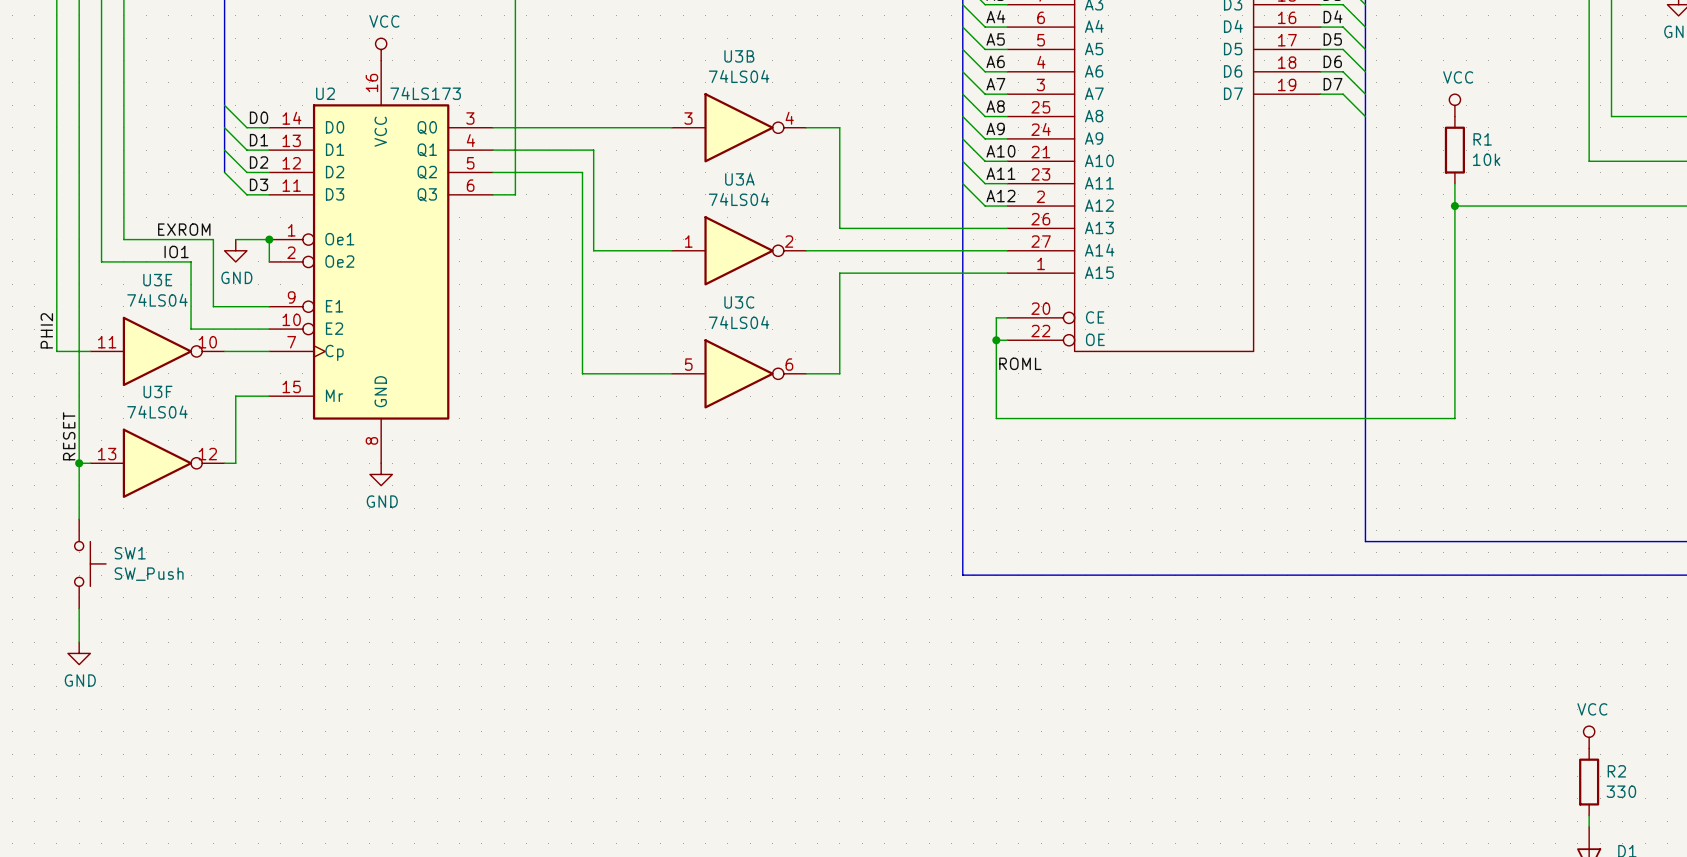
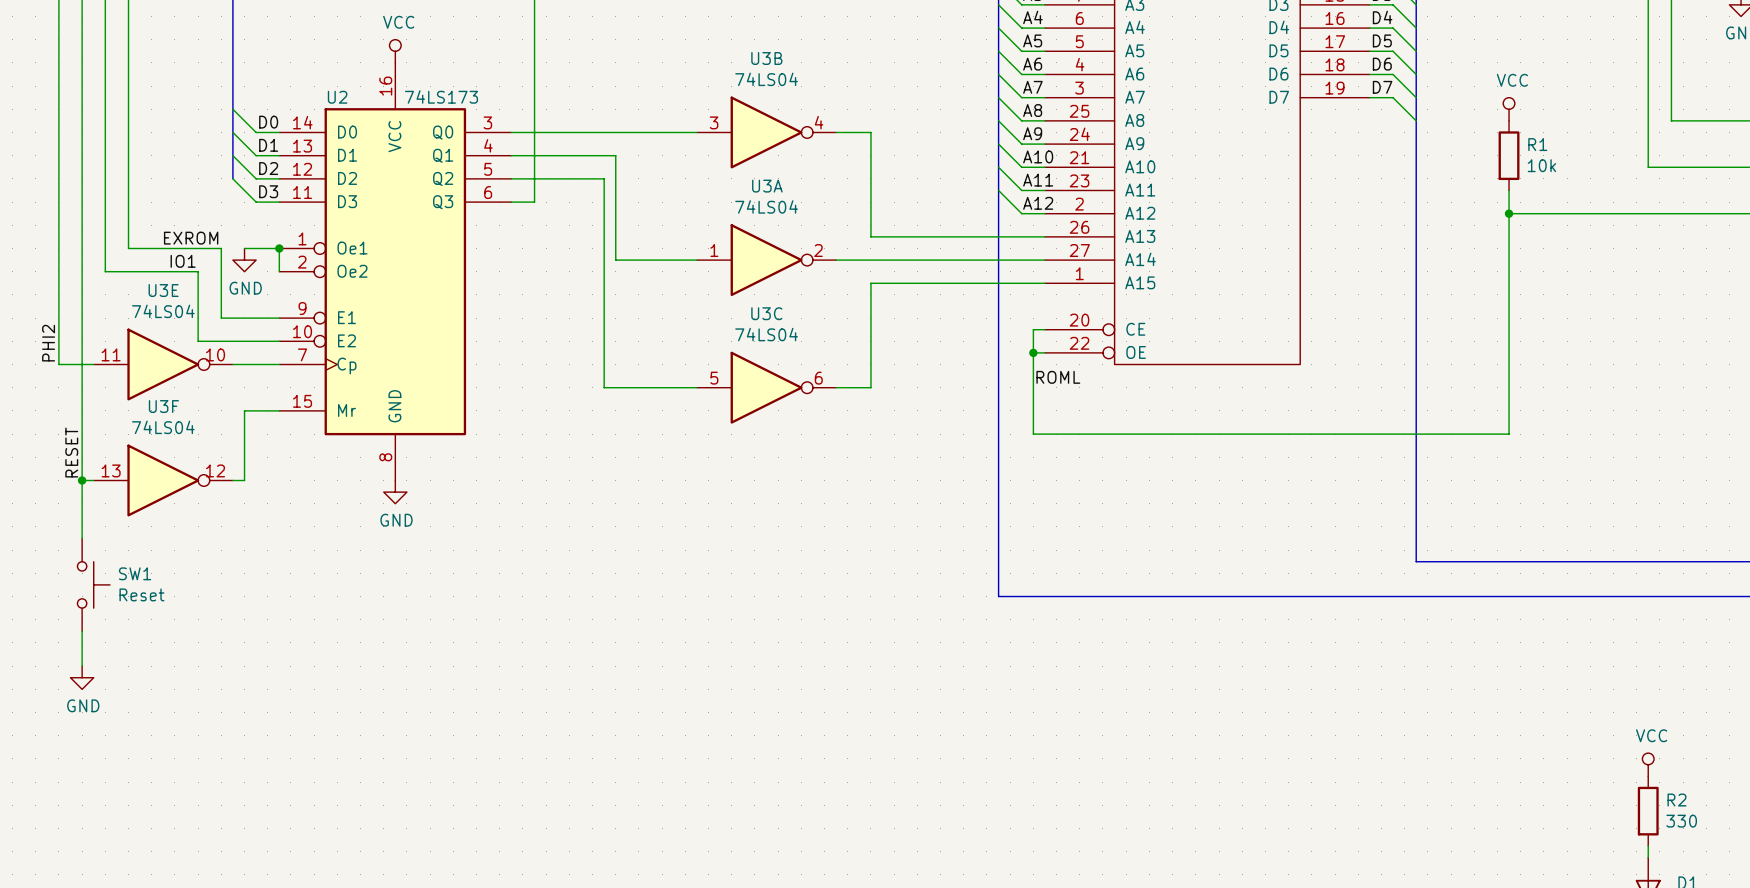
SW1 value: SW_Push (149, 574) -> Reset (141, 594)

